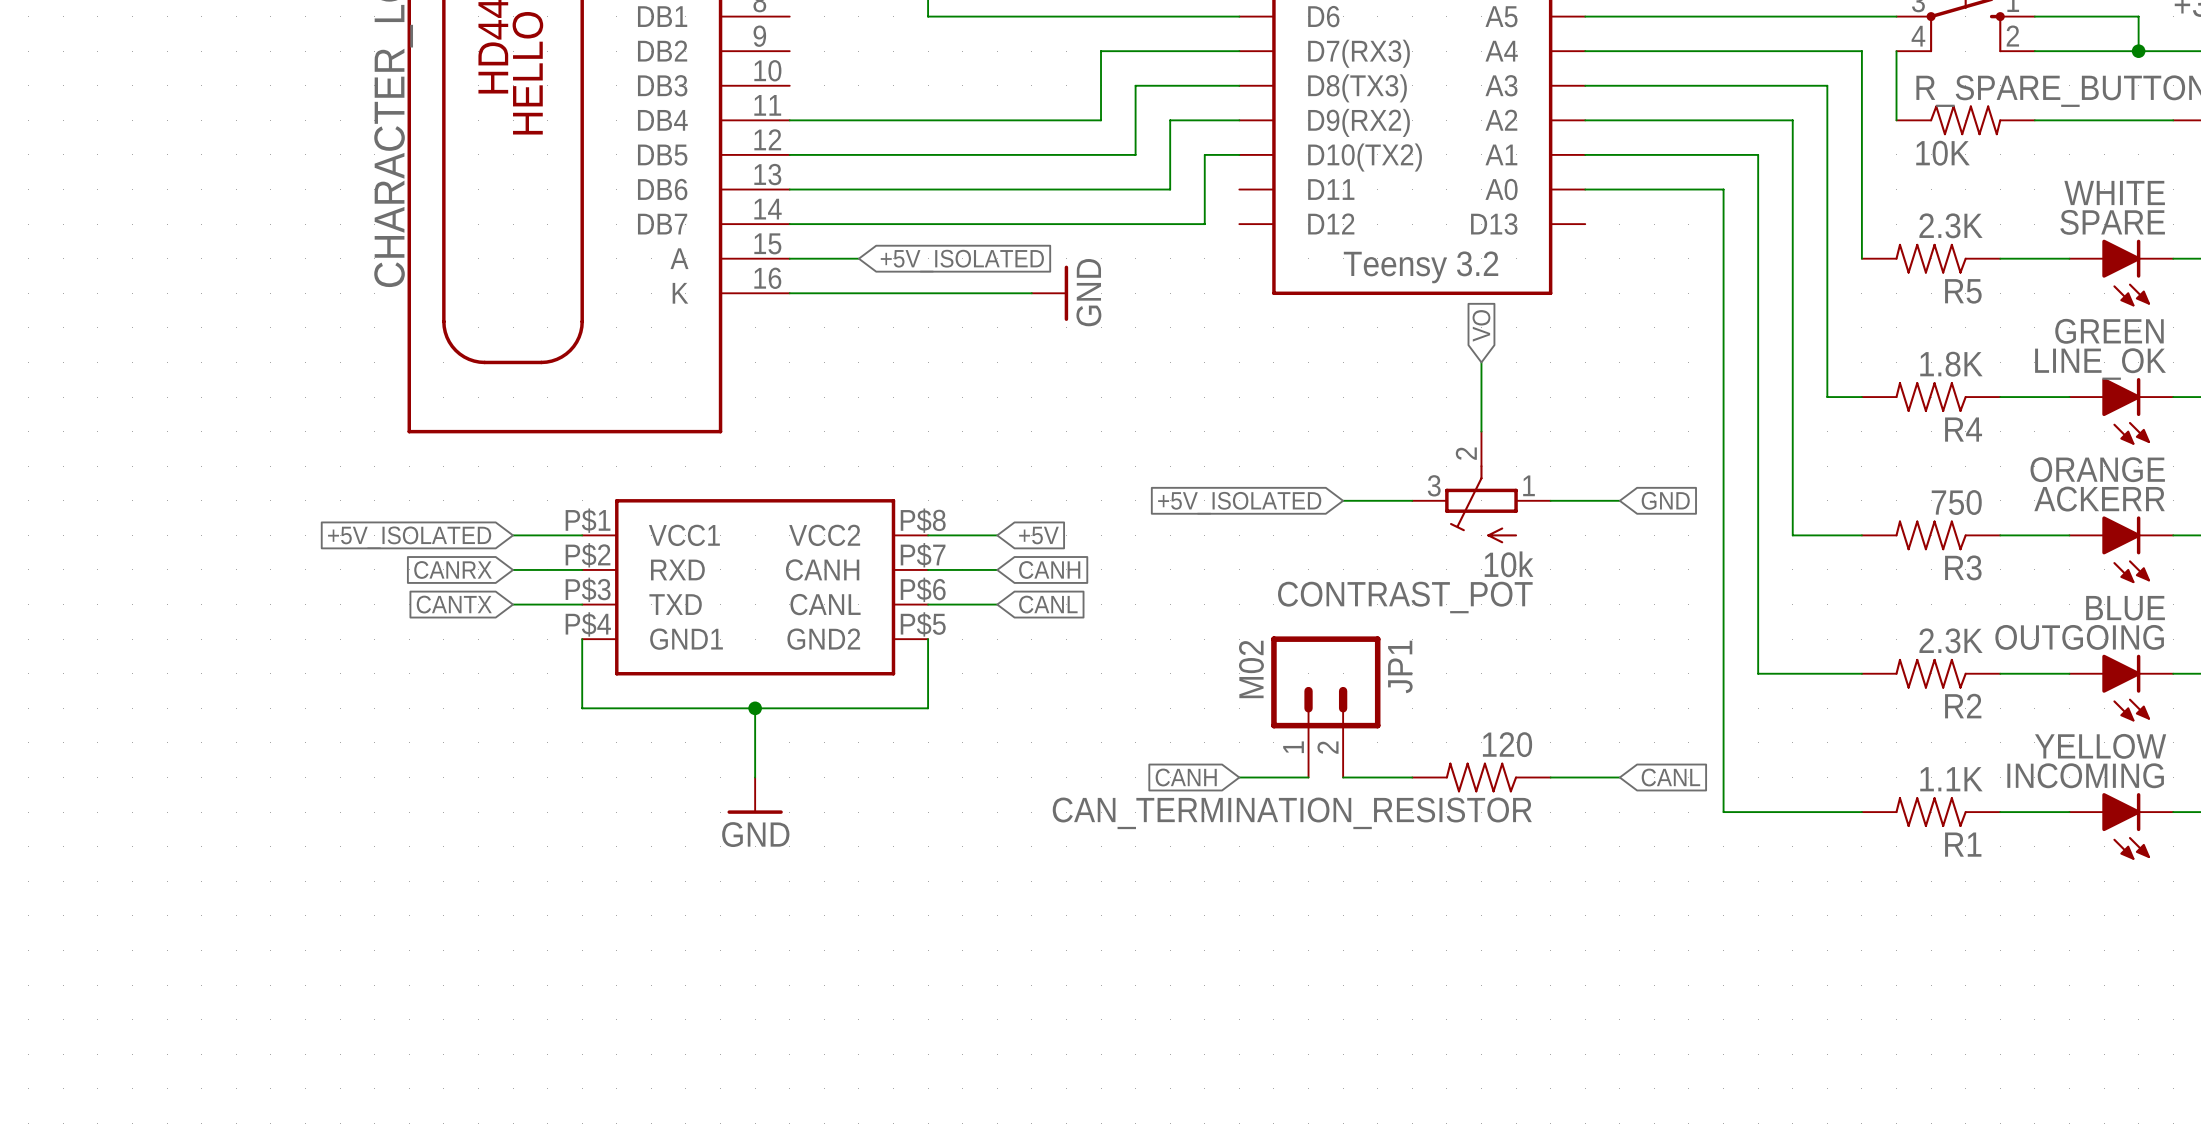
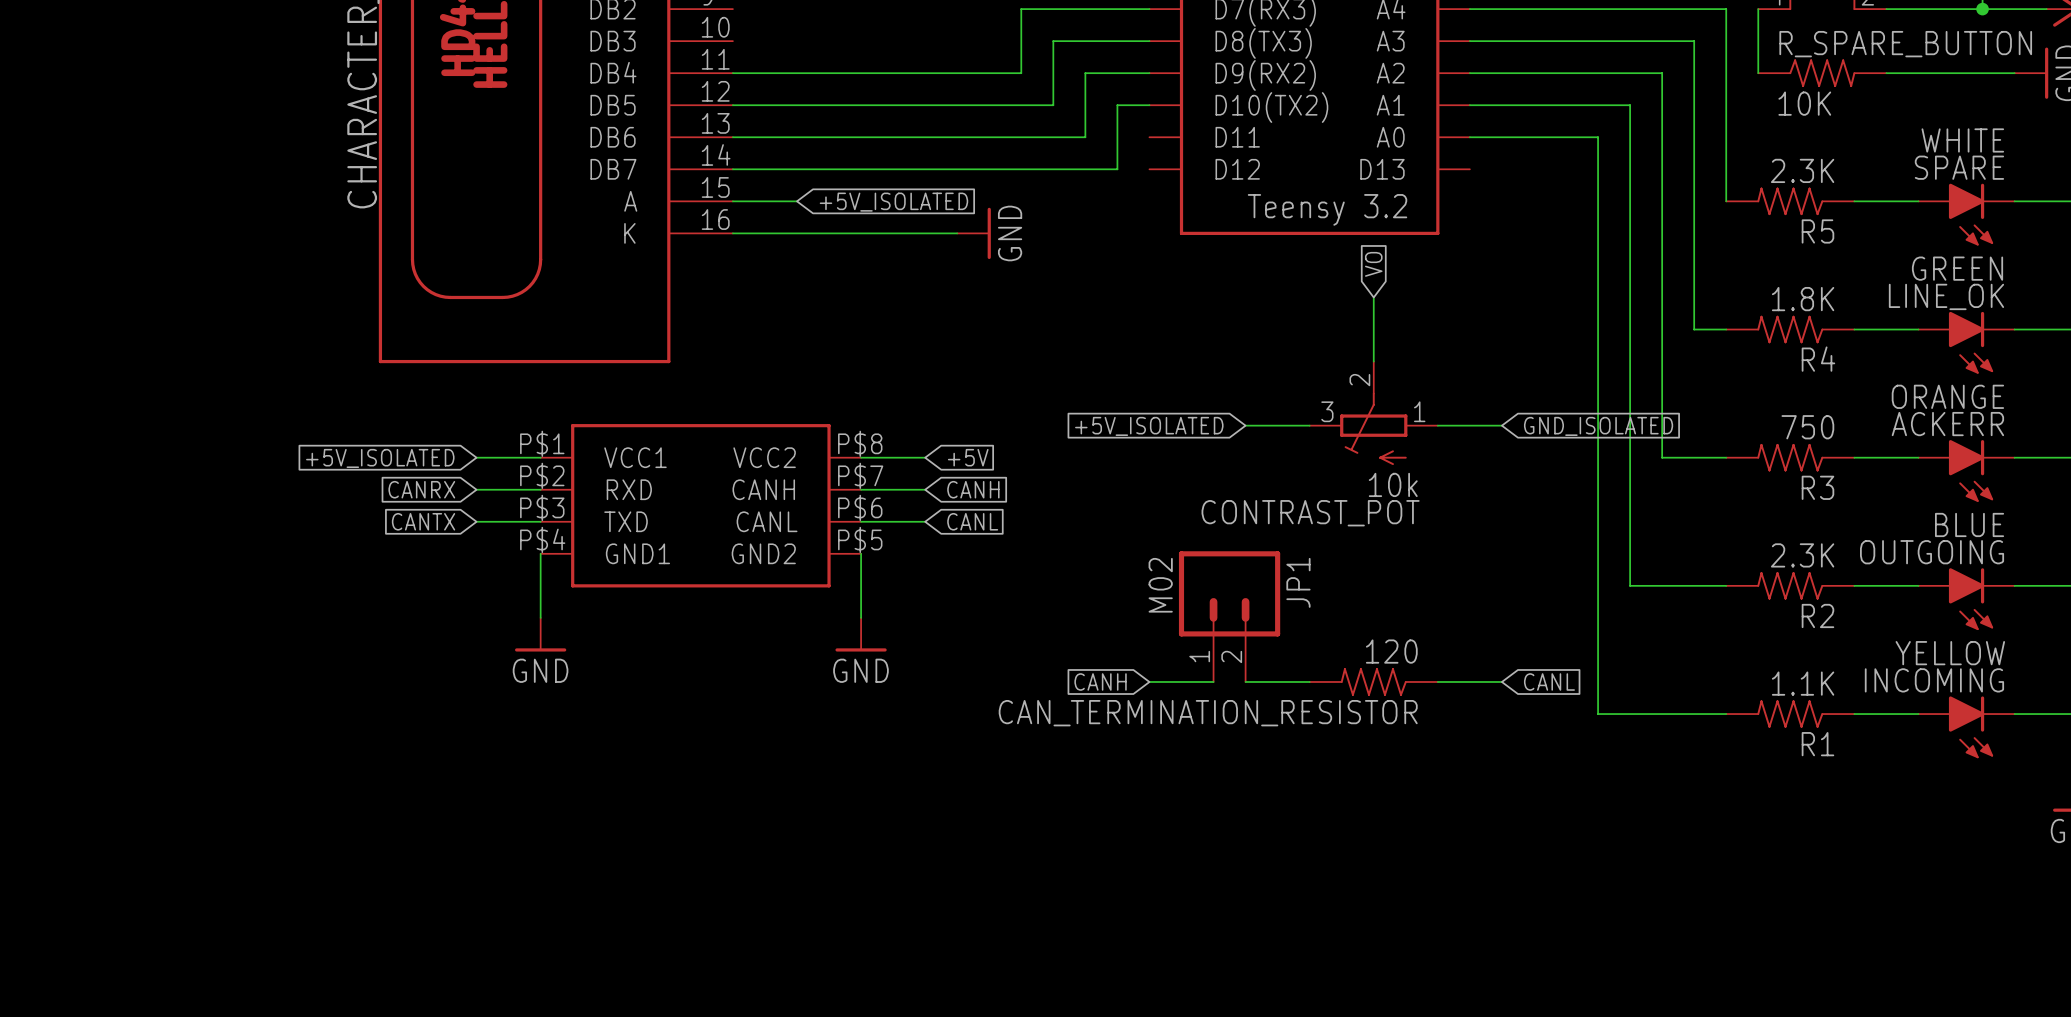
global label: GND (1665, 500) -> GND_ISOLATED (1598, 426)
wire: (582, 708) (928, 708) -> none
wire: (755, 708) (755, 777) -> none
junction: (755, 708) -> none
power symbol: none -> GND (540, 634)
power symbol: none -> GND (861, 634)
power symbol: GND (755, 795) -> none

